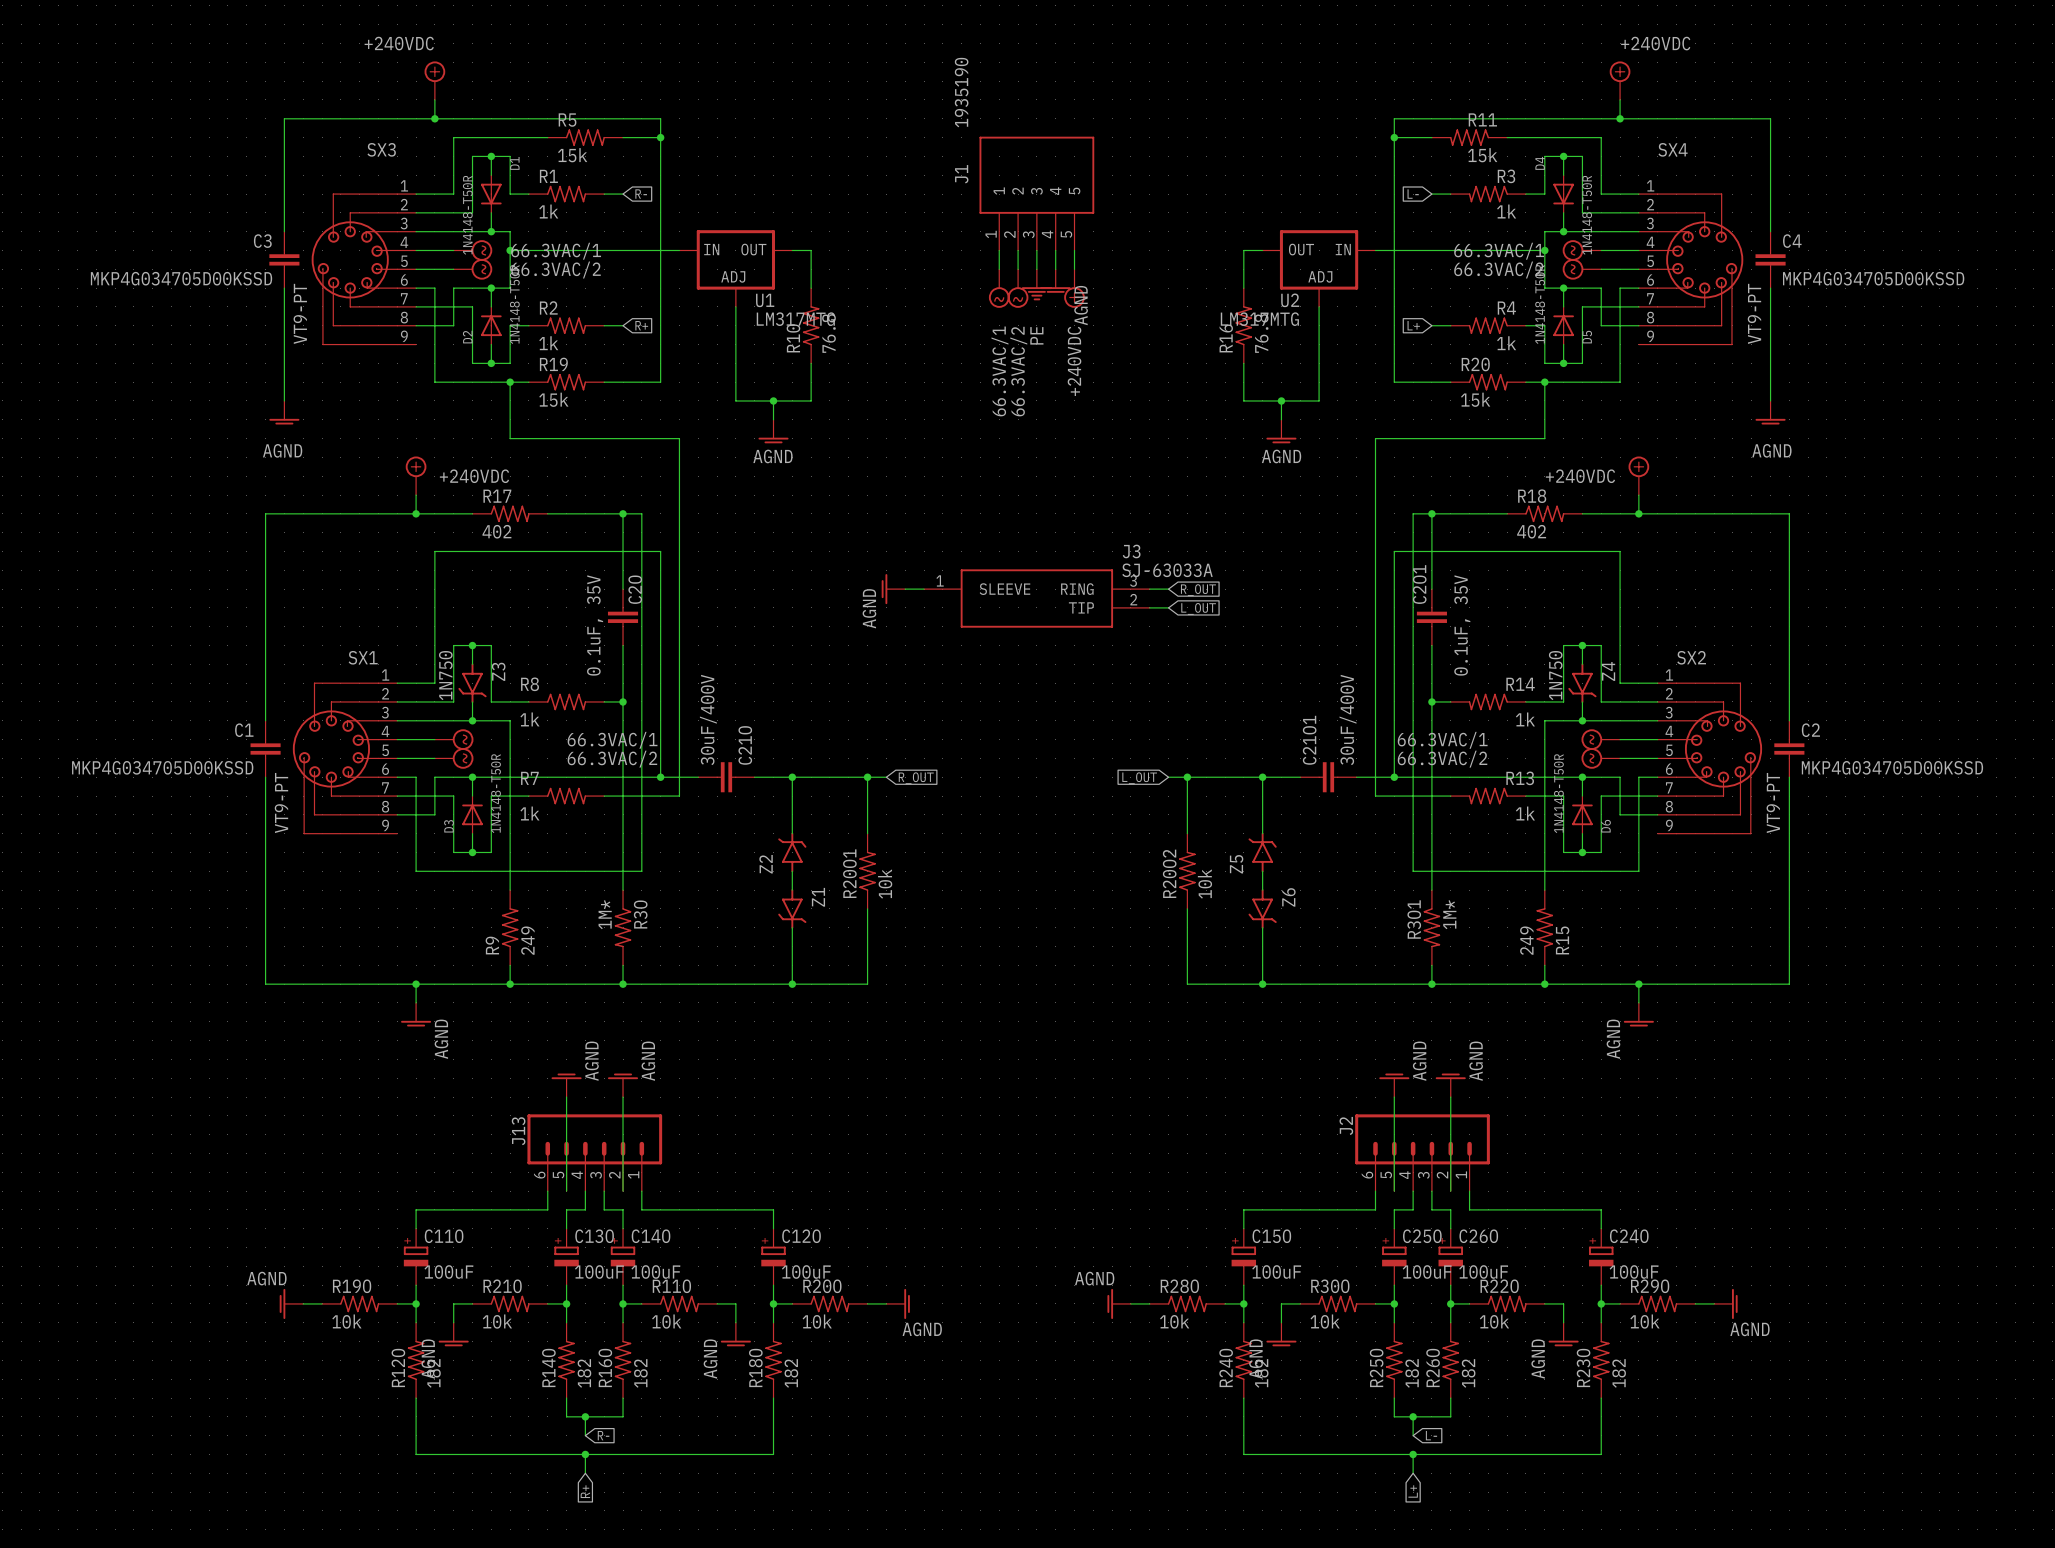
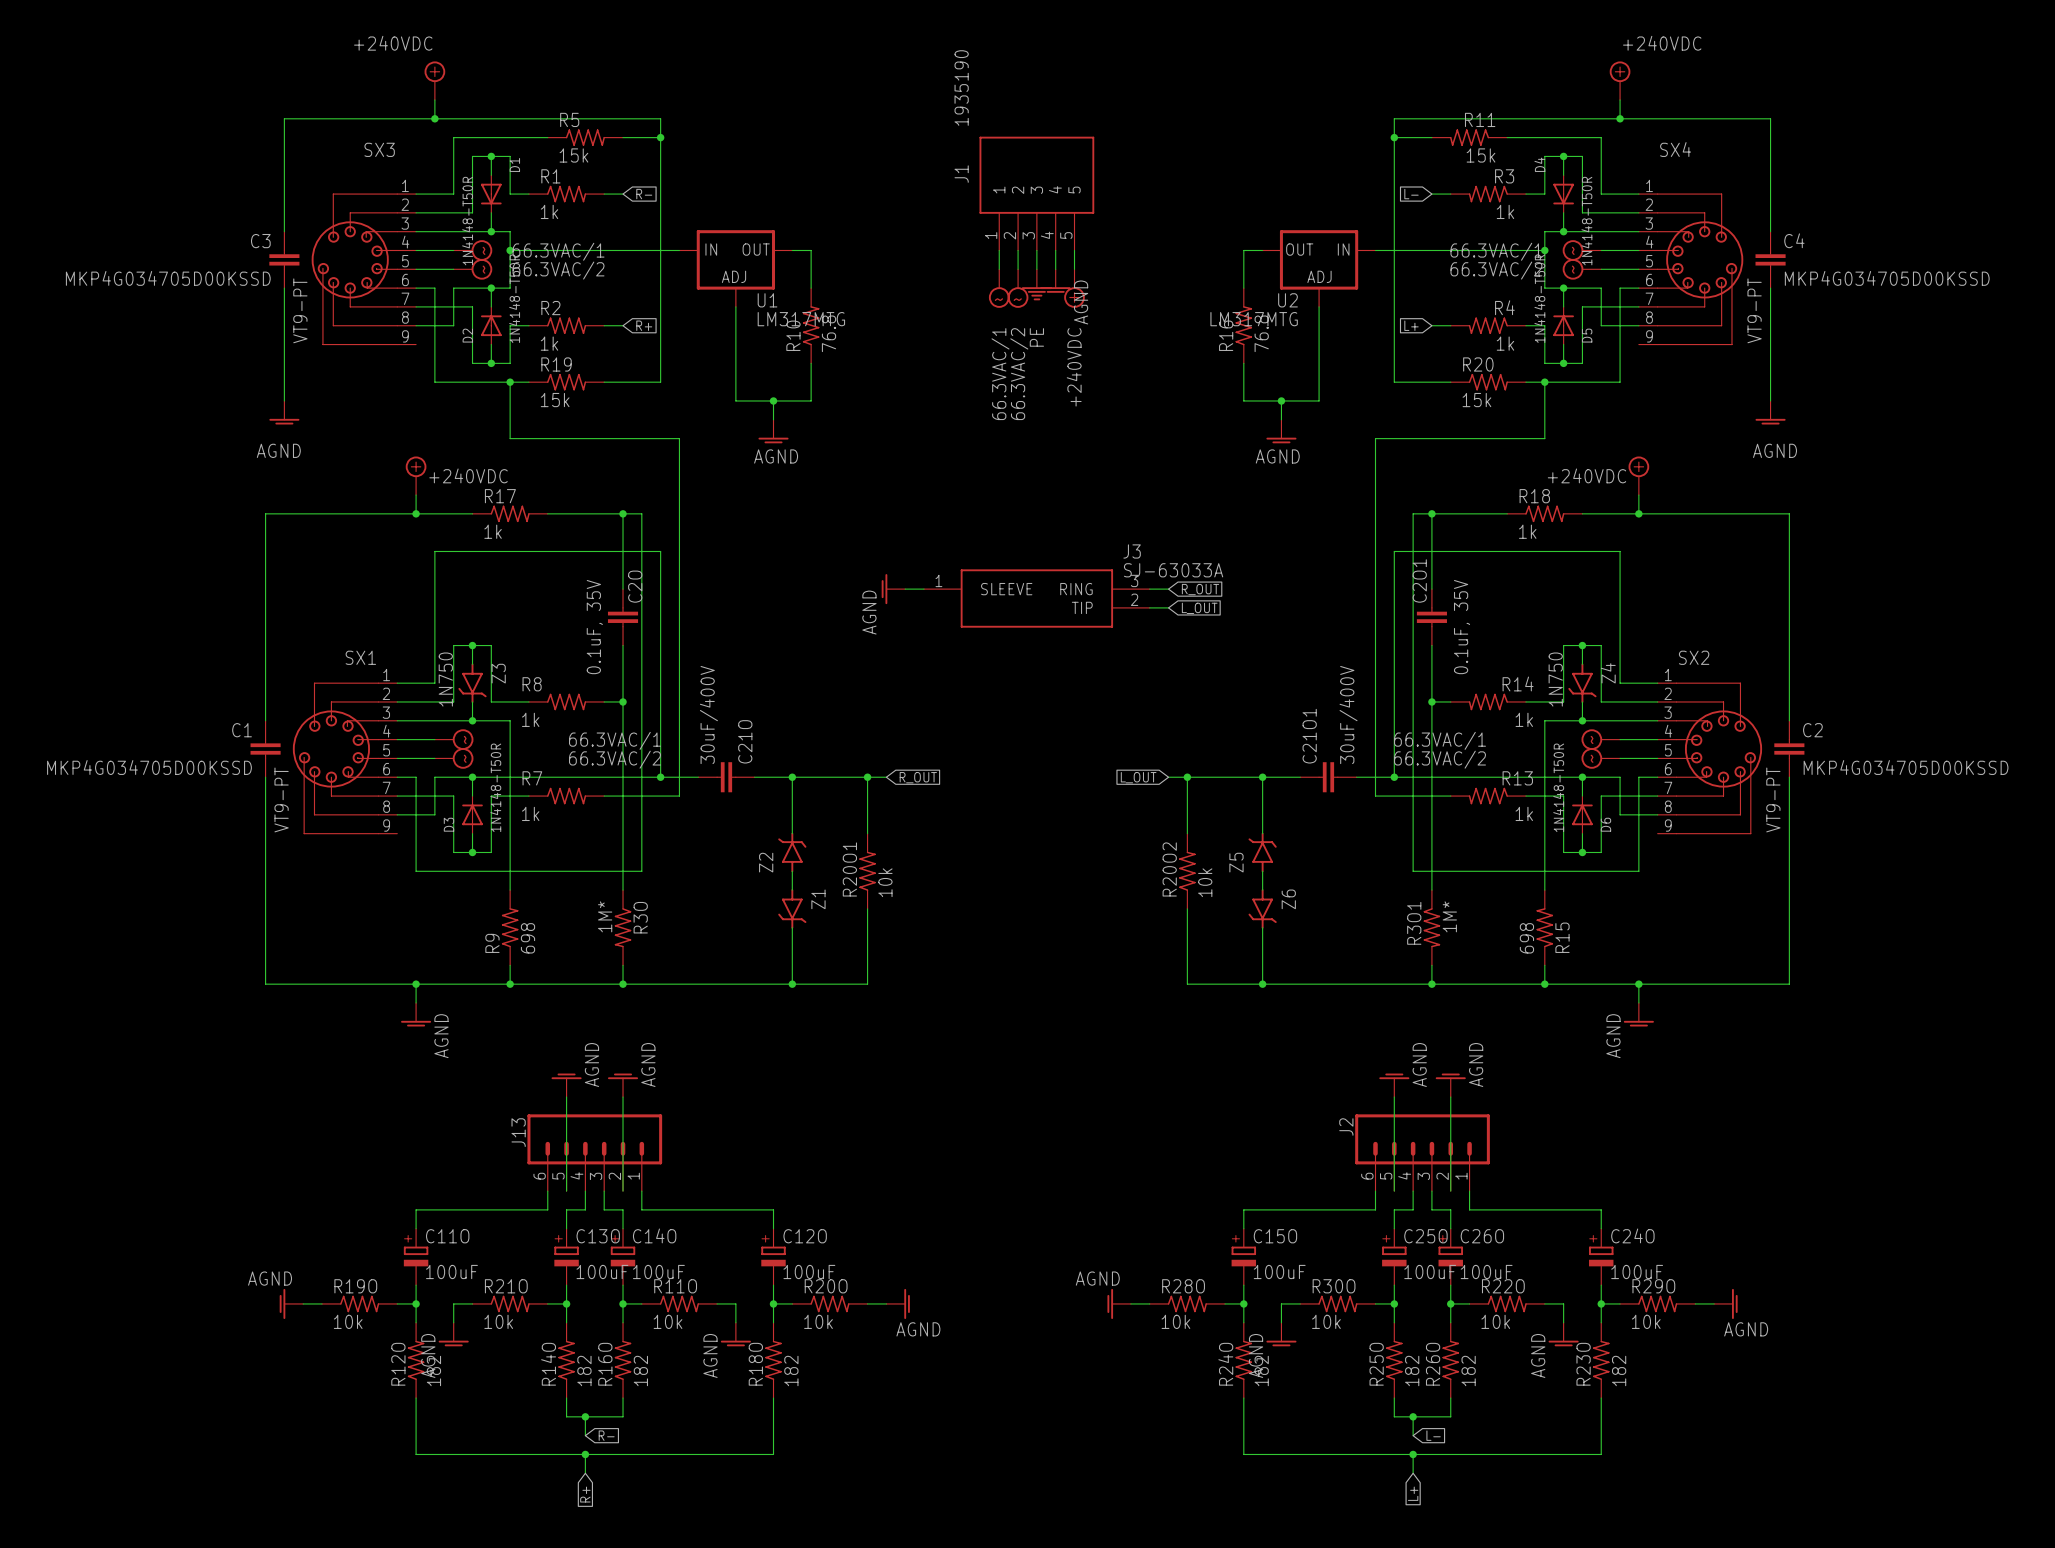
R17 value: 402 (496, 531) -> 1k (493, 531)
R18 value: 402 (1531, 531) -> 1k (1527, 531)
R9 value: 249 (527, 940) -> 698 (528, 938)
R15 value: 249 (1526, 940) -> 698 (1526, 938)

